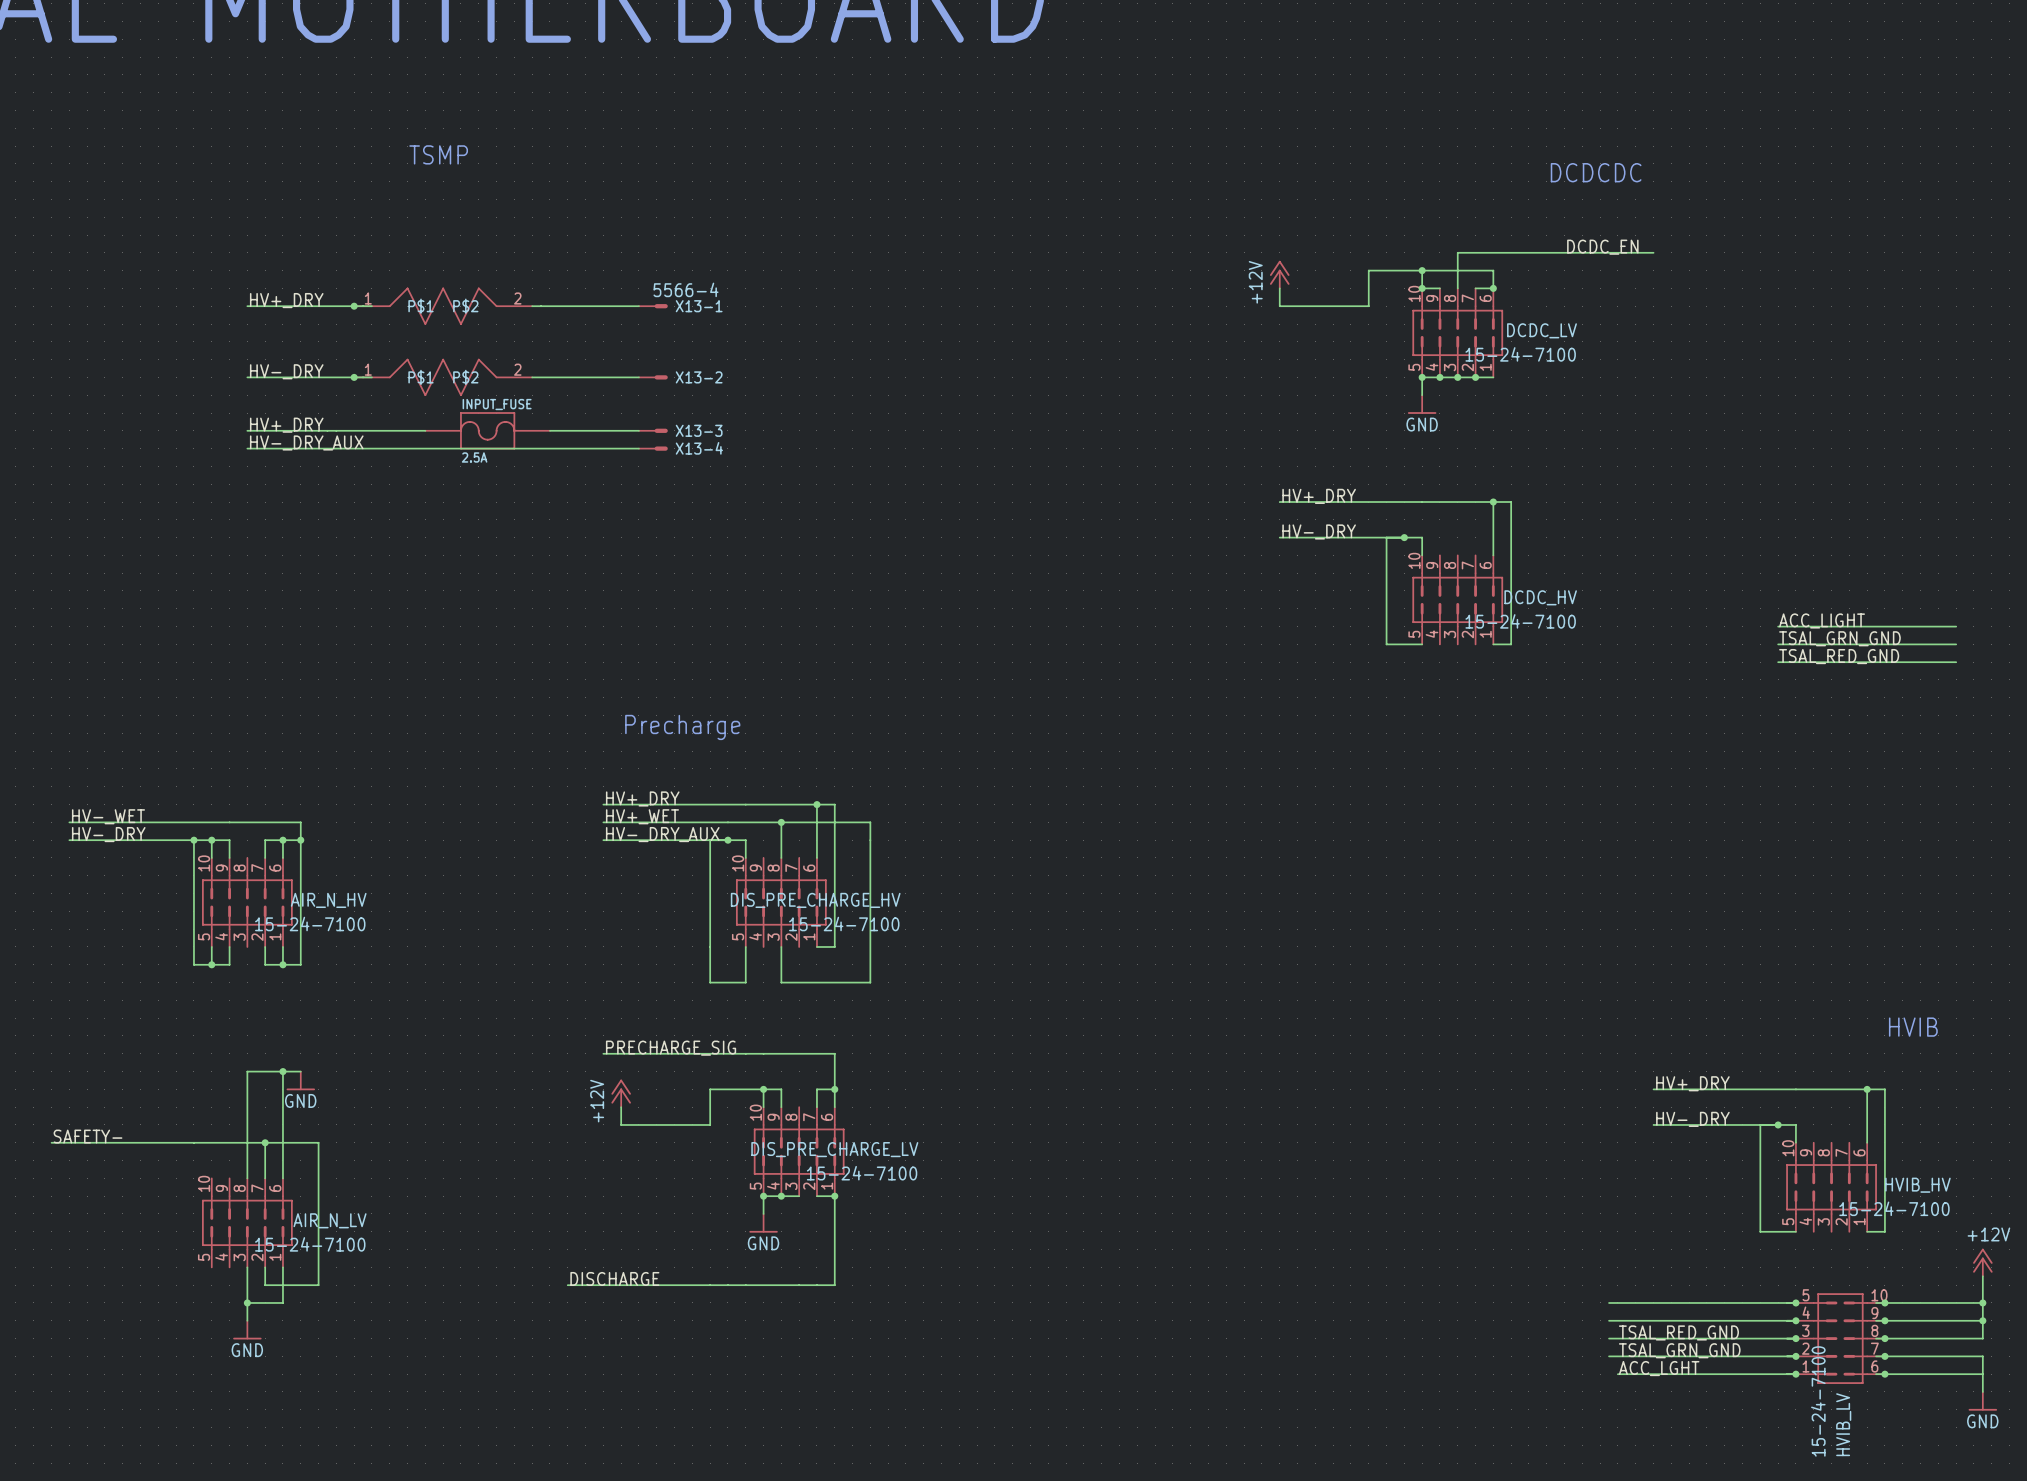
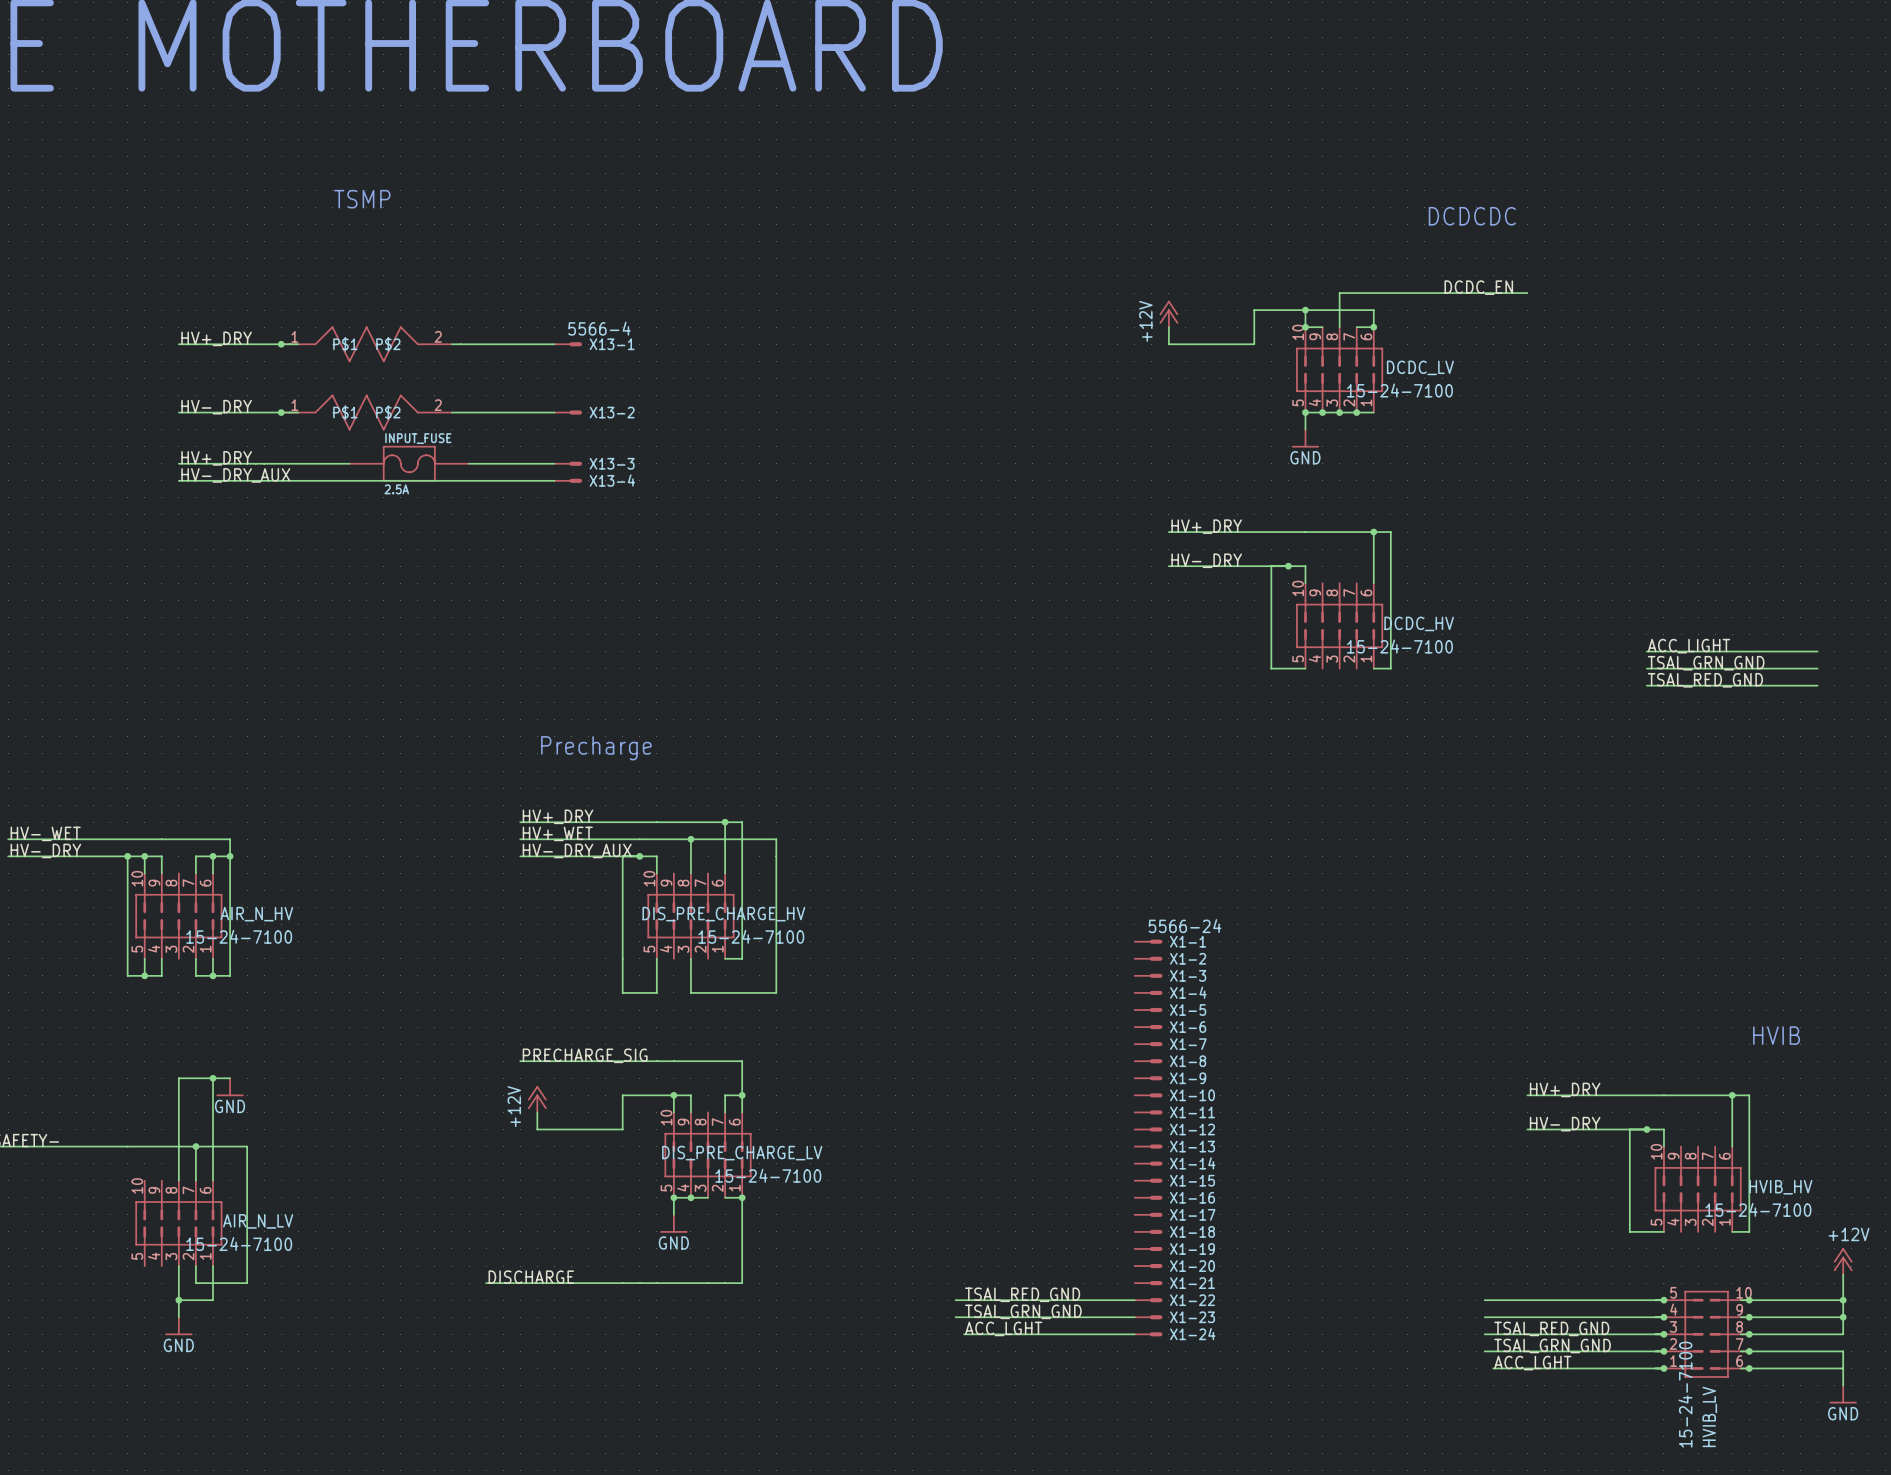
X1-1: none -> 5566-24 (1148, 941)
X1-2: none -> (1148, 958)
X1-3: none -> (1148, 975)
X1-4: none -> (1148, 992)
X1-5: none -> (1148, 1010)
X1-6: none -> (1148, 1027)
X1-7: none -> (1148, 1044)
X1-8: none -> (1148, 1061)
X1-9: none -> (1148, 1078)
X1-10: none -> (1148, 1095)
X1-11: none -> (1148, 1112)
X1-12: none -> (1148, 1129)
X1-13: none -> (1148, 1146)
X1-14: none -> (1148, 1163)
X1-15: none -> (1148, 1180)
X1-16: none -> (1148, 1197)
X1-17: none -> (1148, 1214)
X1-18: none -> (1148, 1231)
X1-19: none -> (1148, 1248)
X1-20: none -> (1148, 1266)
X1-21: none -> (1148, 1283)
label: none -> TSAL_RED_GND (1022, 1294)
wire: none -> (955, 1300) (1134, 1300)
X1-22: none -> (1148, 1300)
label: none -> TSAL_GRN_GND (1023, 1311)
wire: none -> (955, 1317) (1134, 1317)
X1-23: none -> (1148, 1317)
label: none -> ACC_LGHT (1003, 1328)
wire: none -> (964, 1334) (1134, 1334)
X1-24: none -> (1148, 1334)

